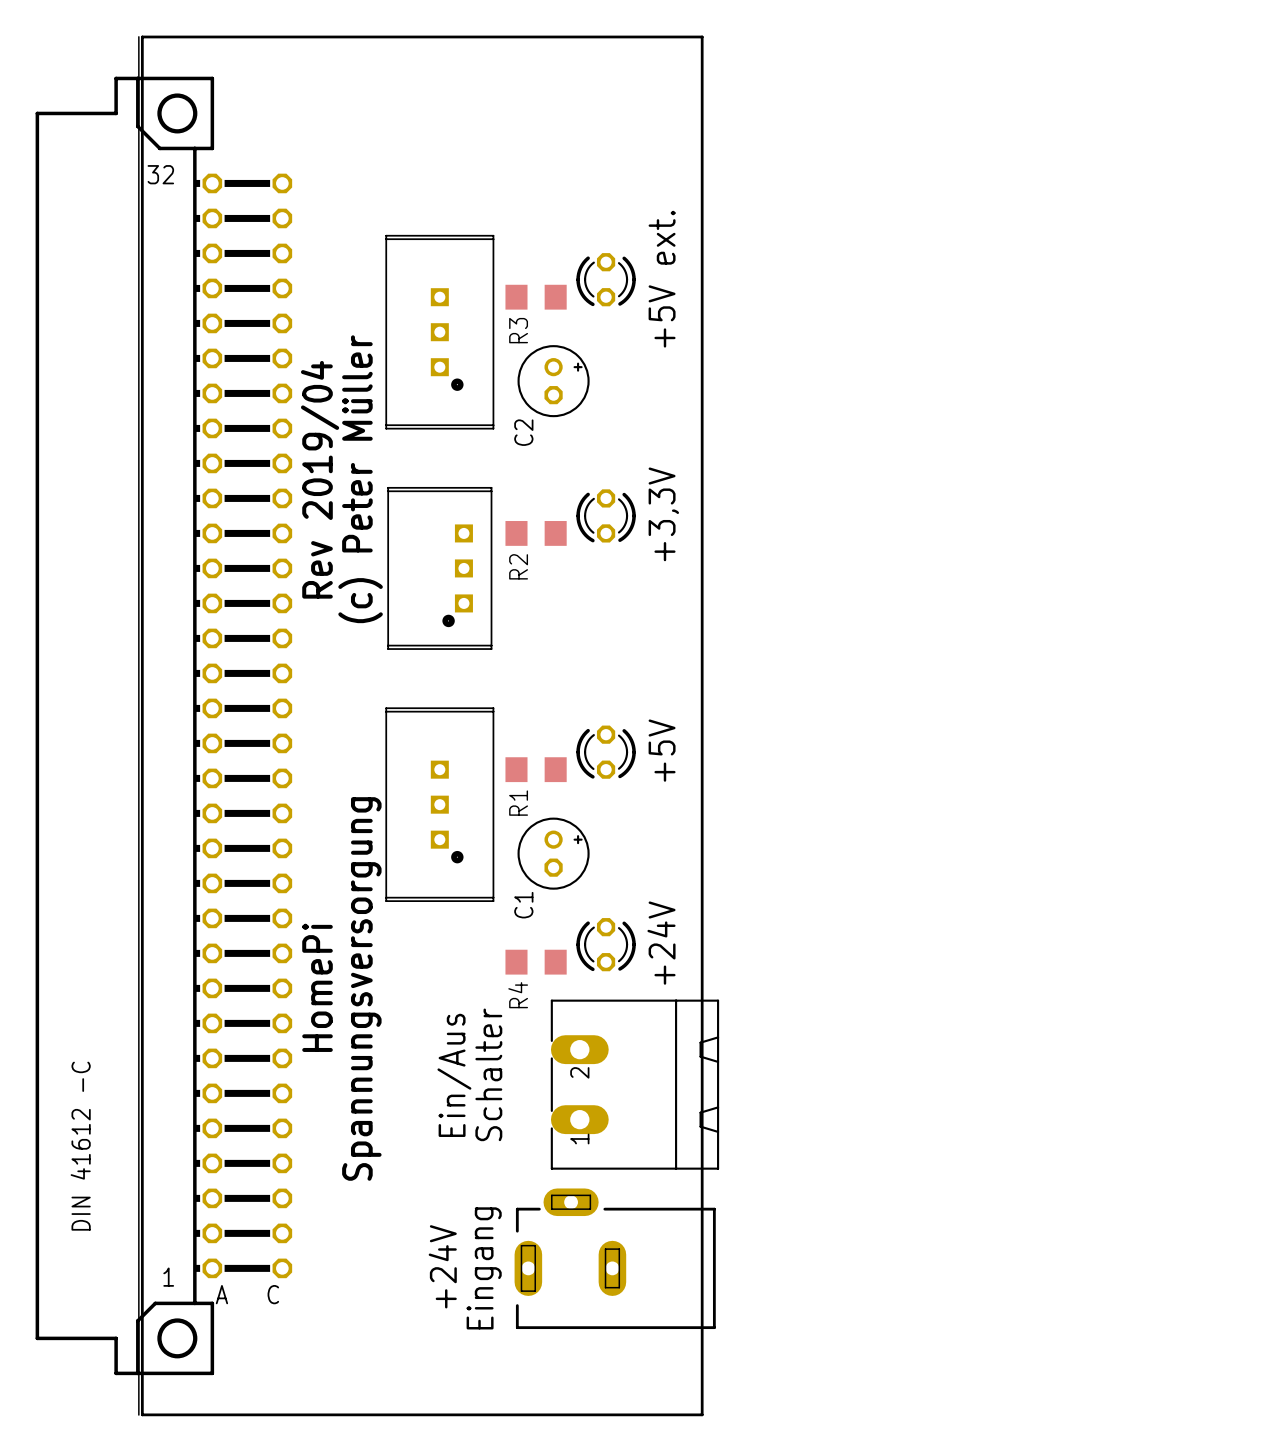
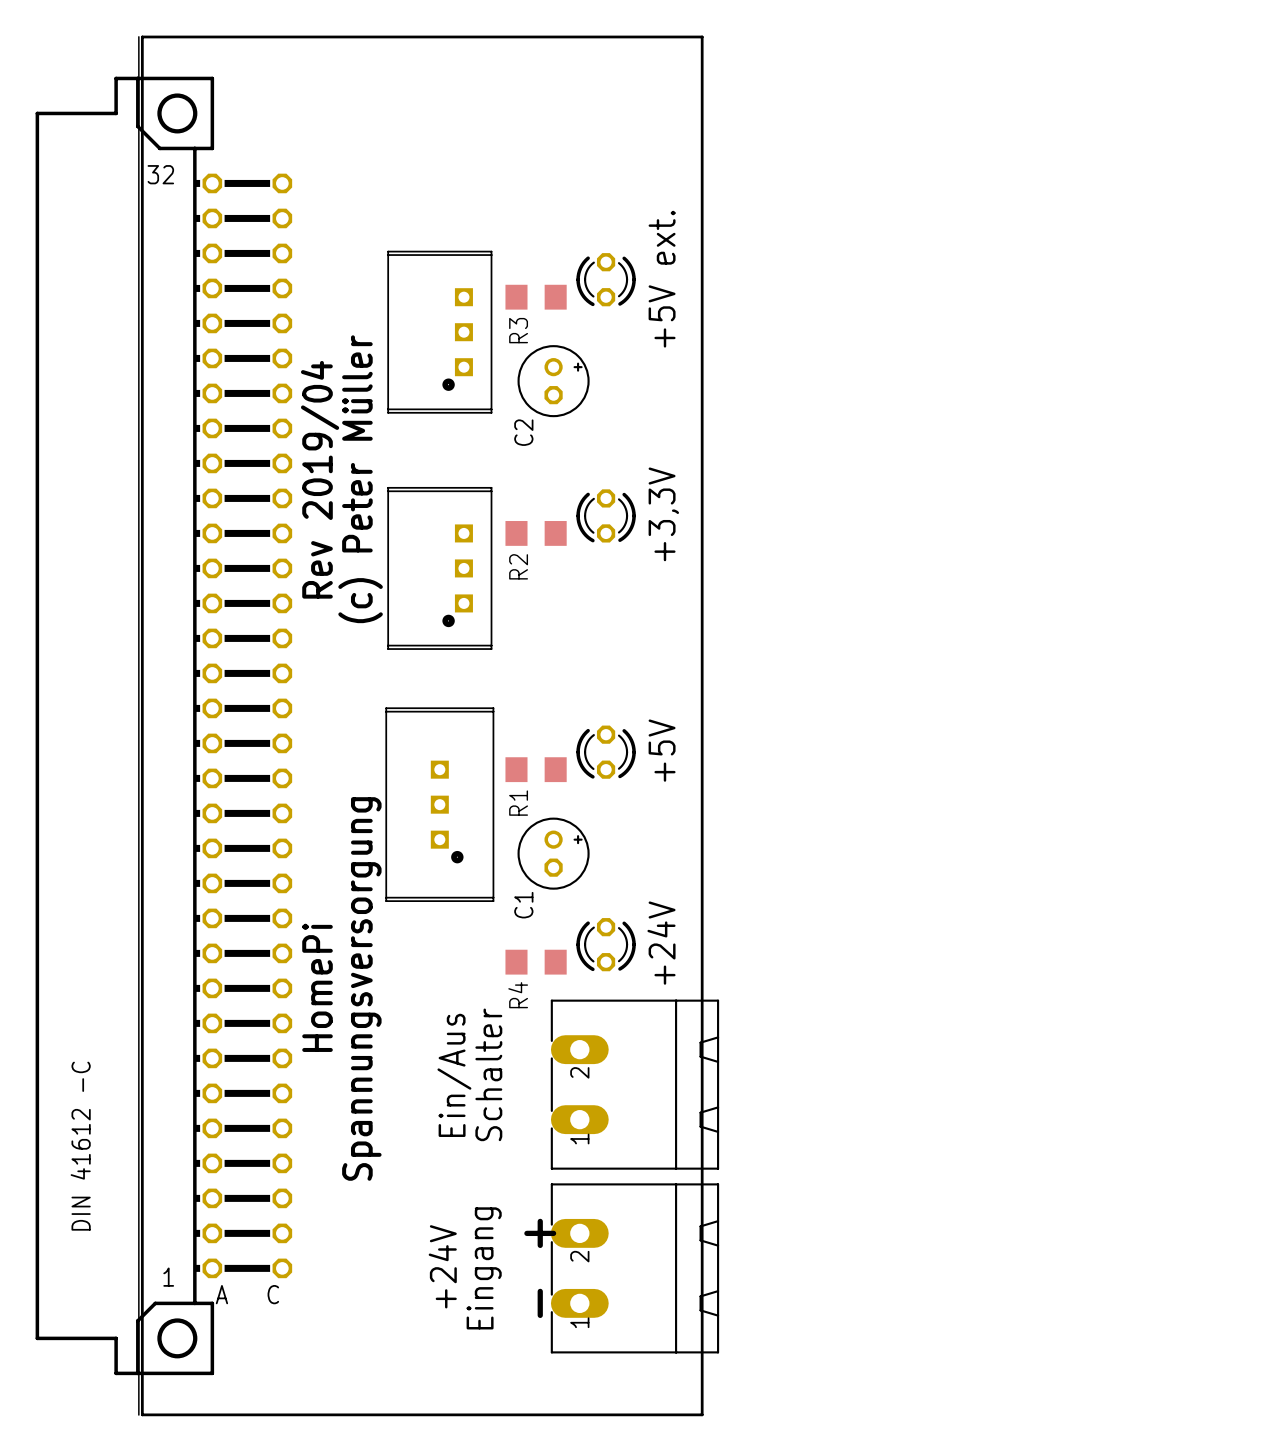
part footprint: [385, 234, 495, 430] -> [387, 250, 493, 414]
text: none -> + (540, 1233)
part: (615, 1258) -> none
part: none -> (634, 1268)
text: none -> - (540, 1303)

